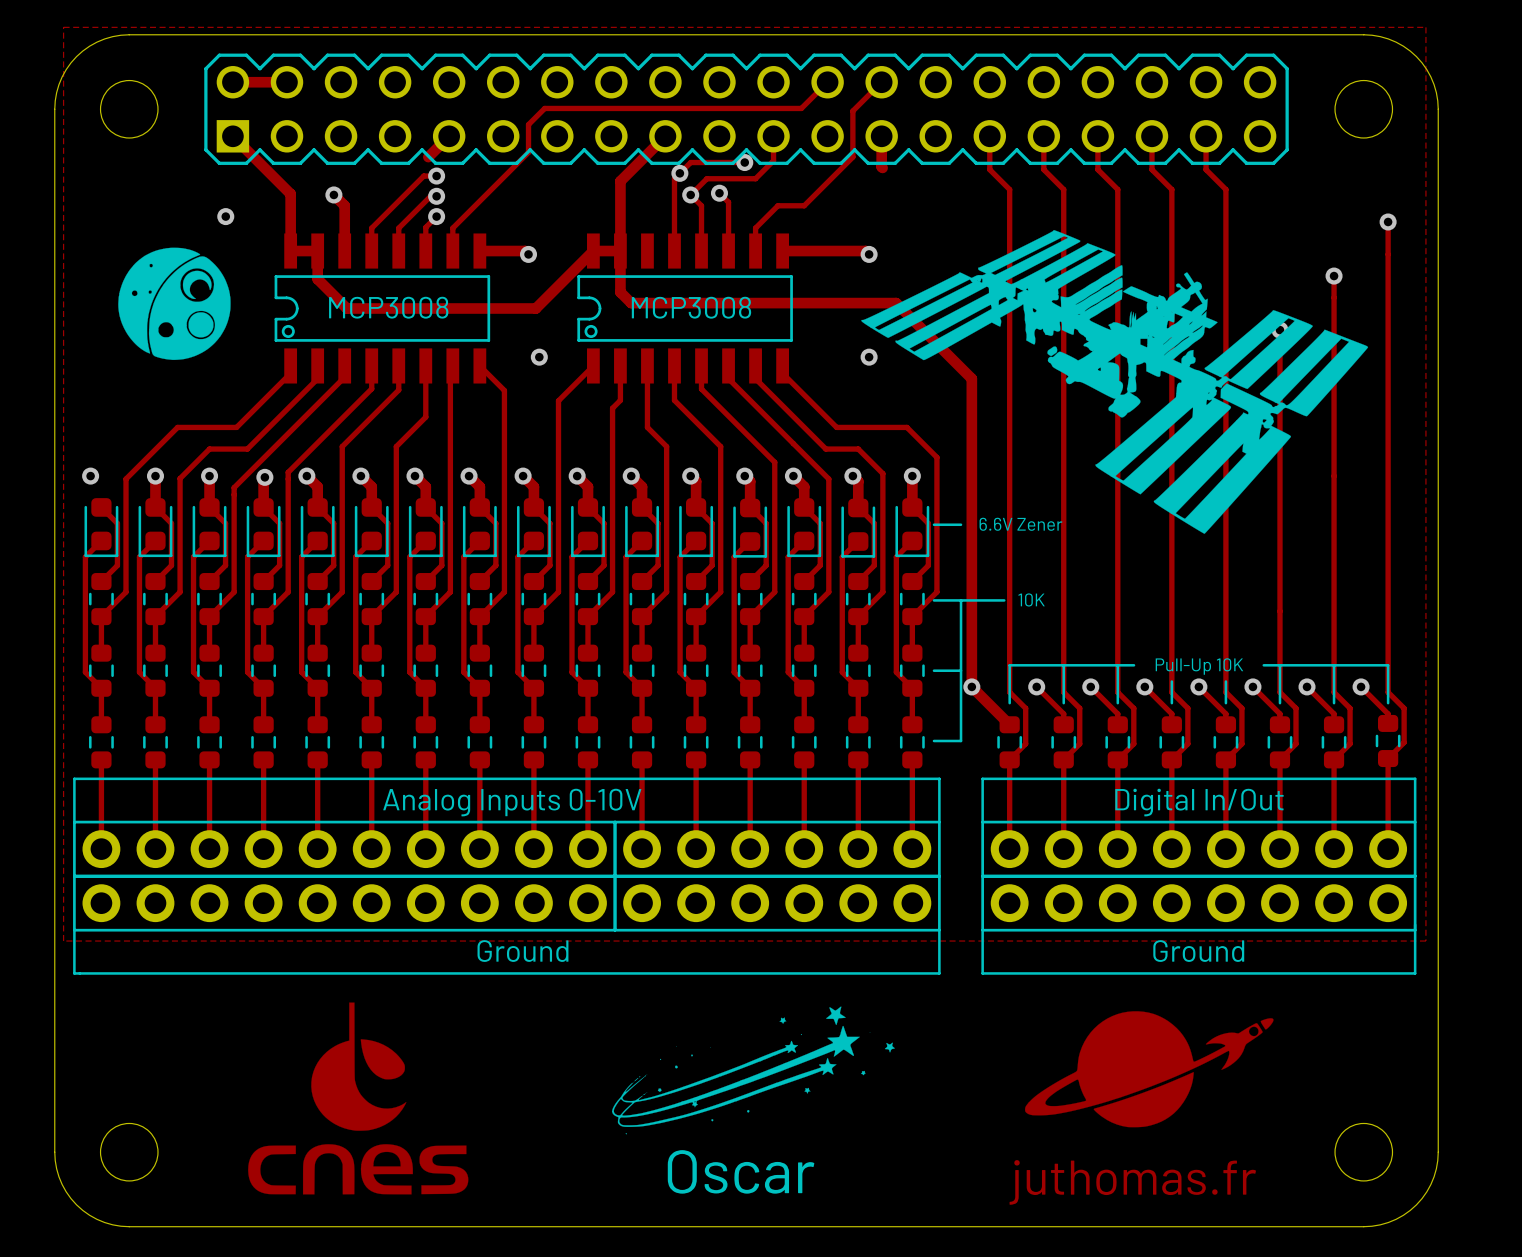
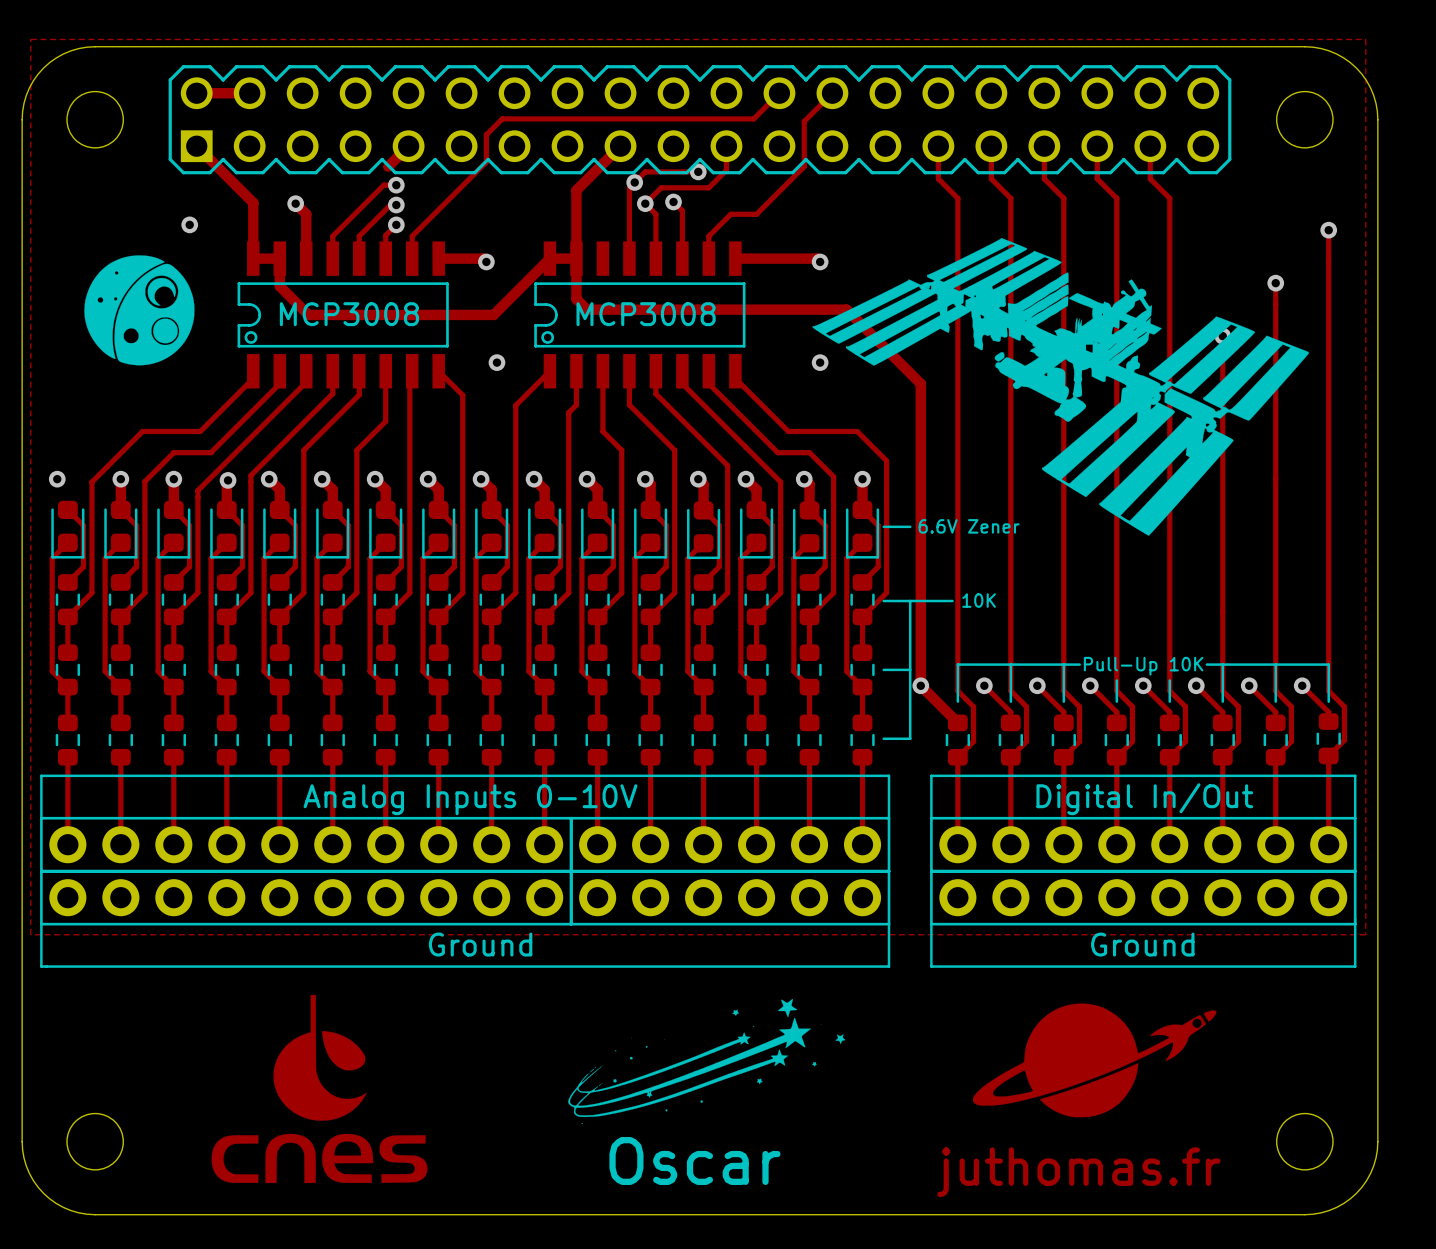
track: (881, 136) (882, 167) -> none

